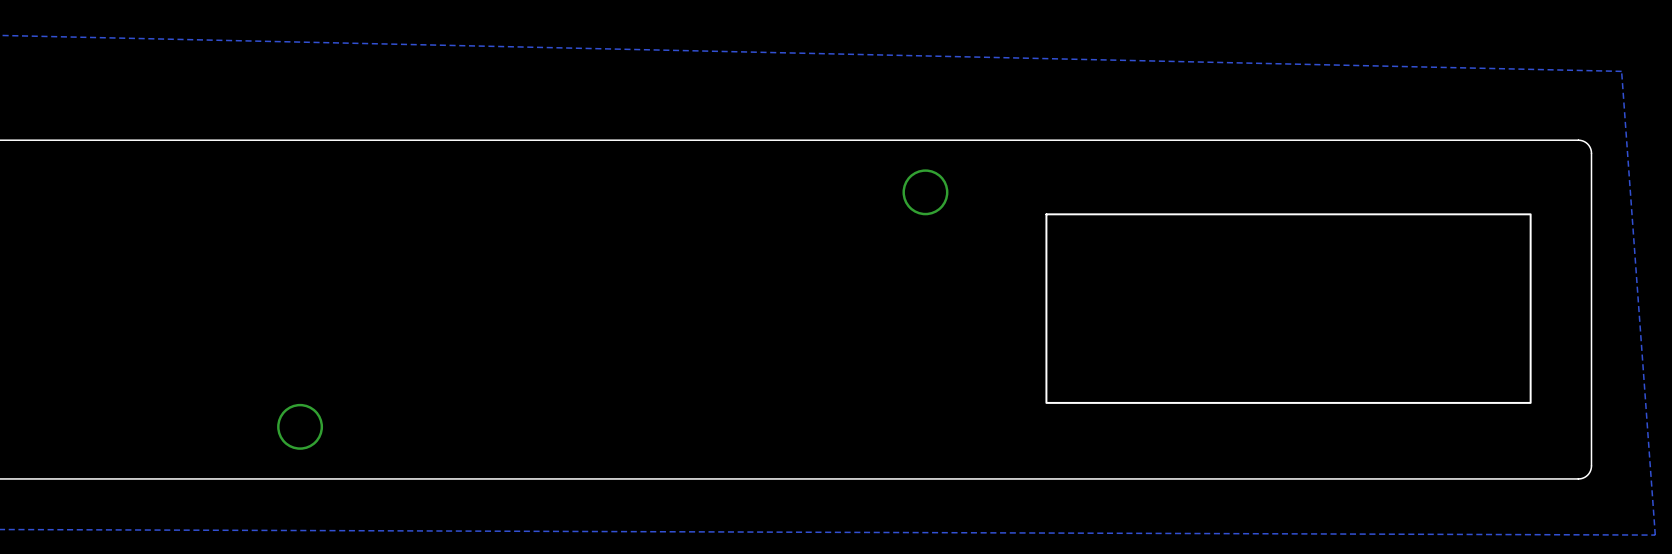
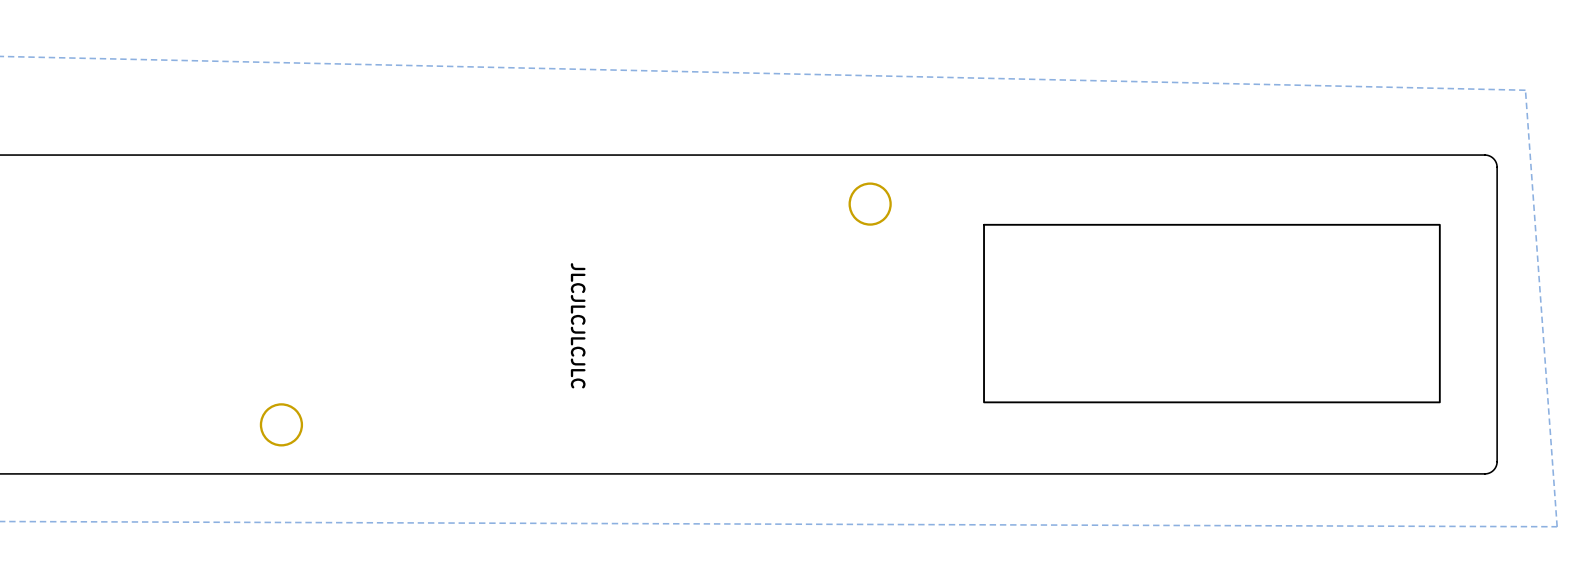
text: none -> JLCJLCJLCJLC (578, 325)

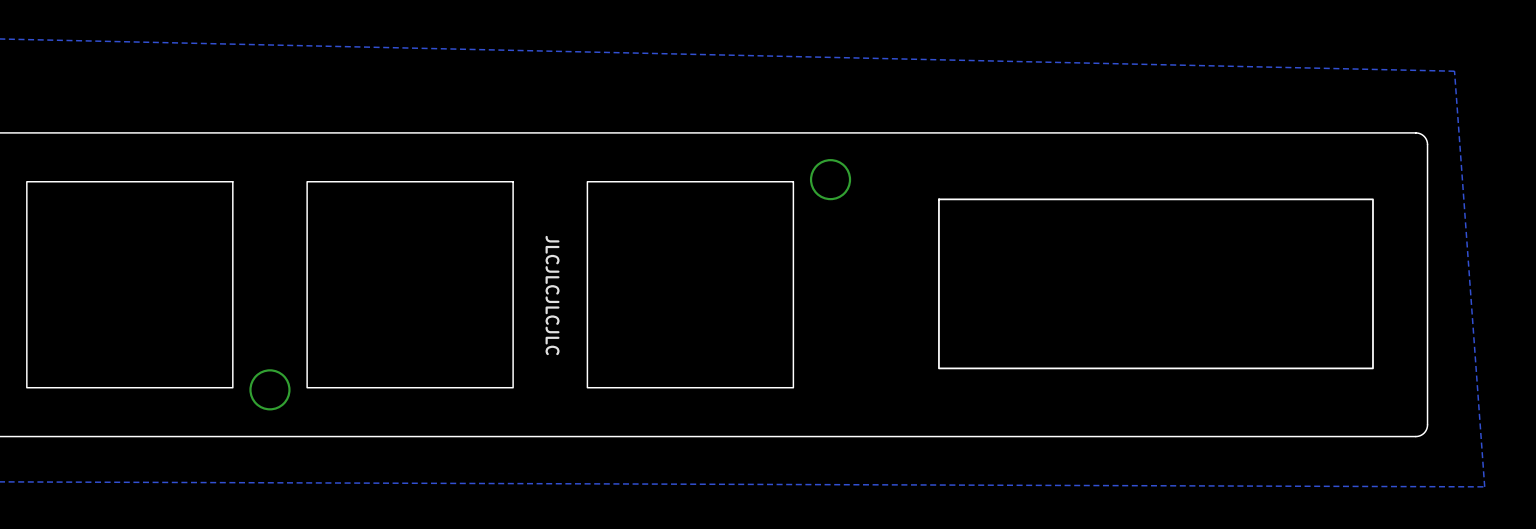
drawing: none -> [26, 181, 234, 389]
drawing: none -> [306, 181, 514, 389]
drawing: none -> [586, 181, 795, 389]

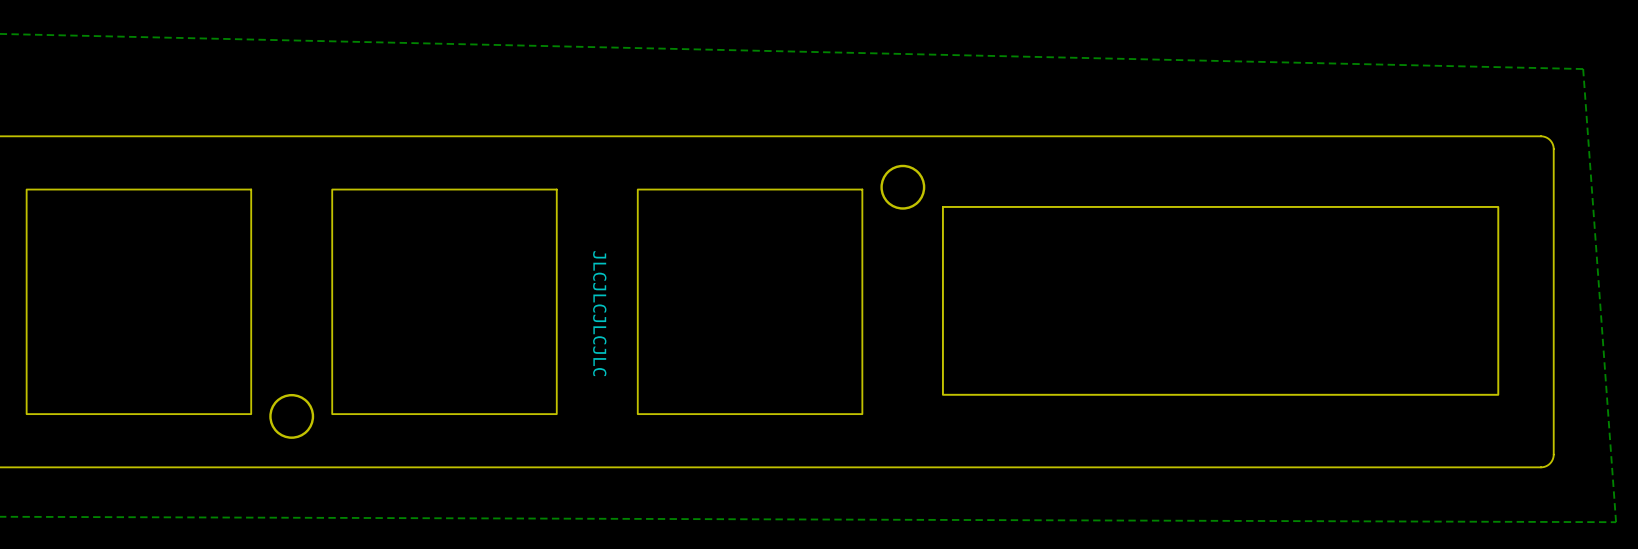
drawing: none -> [941, 206, 1500, 396]
drawing: [938, 198, 1374, 370] -> none

